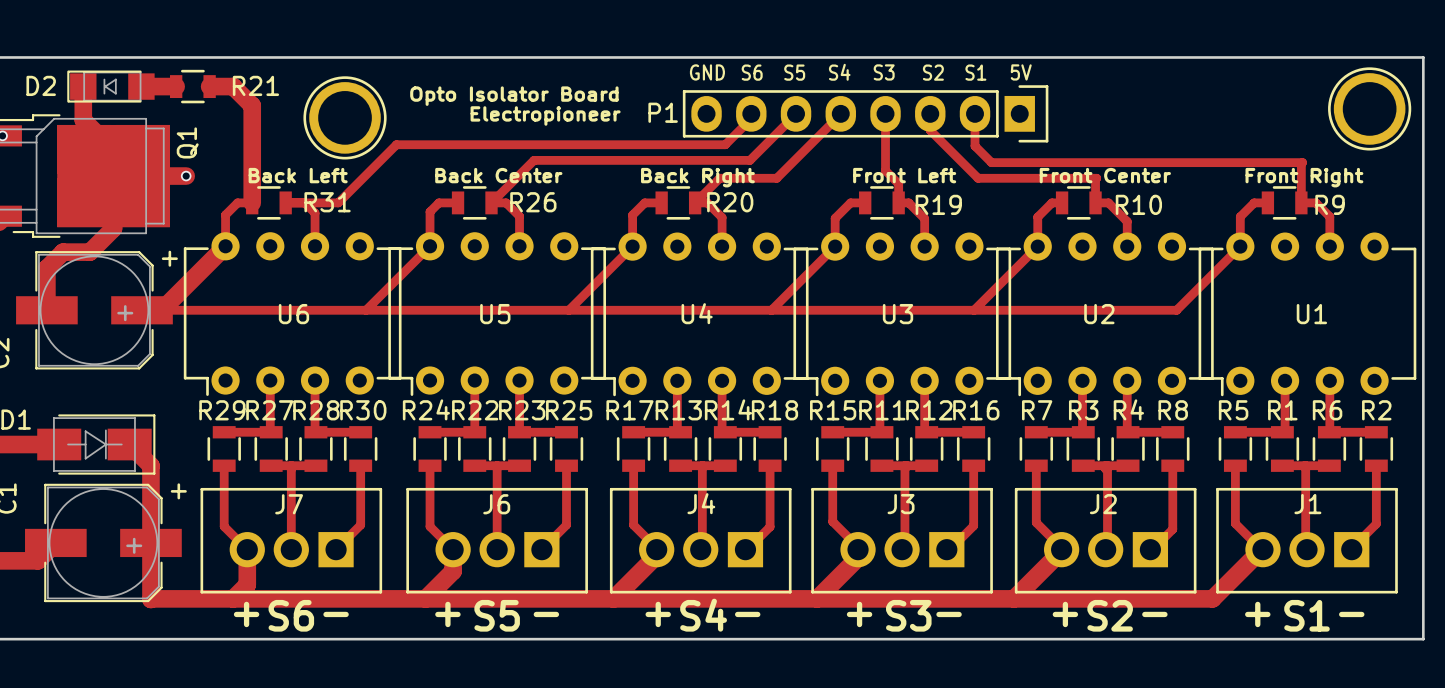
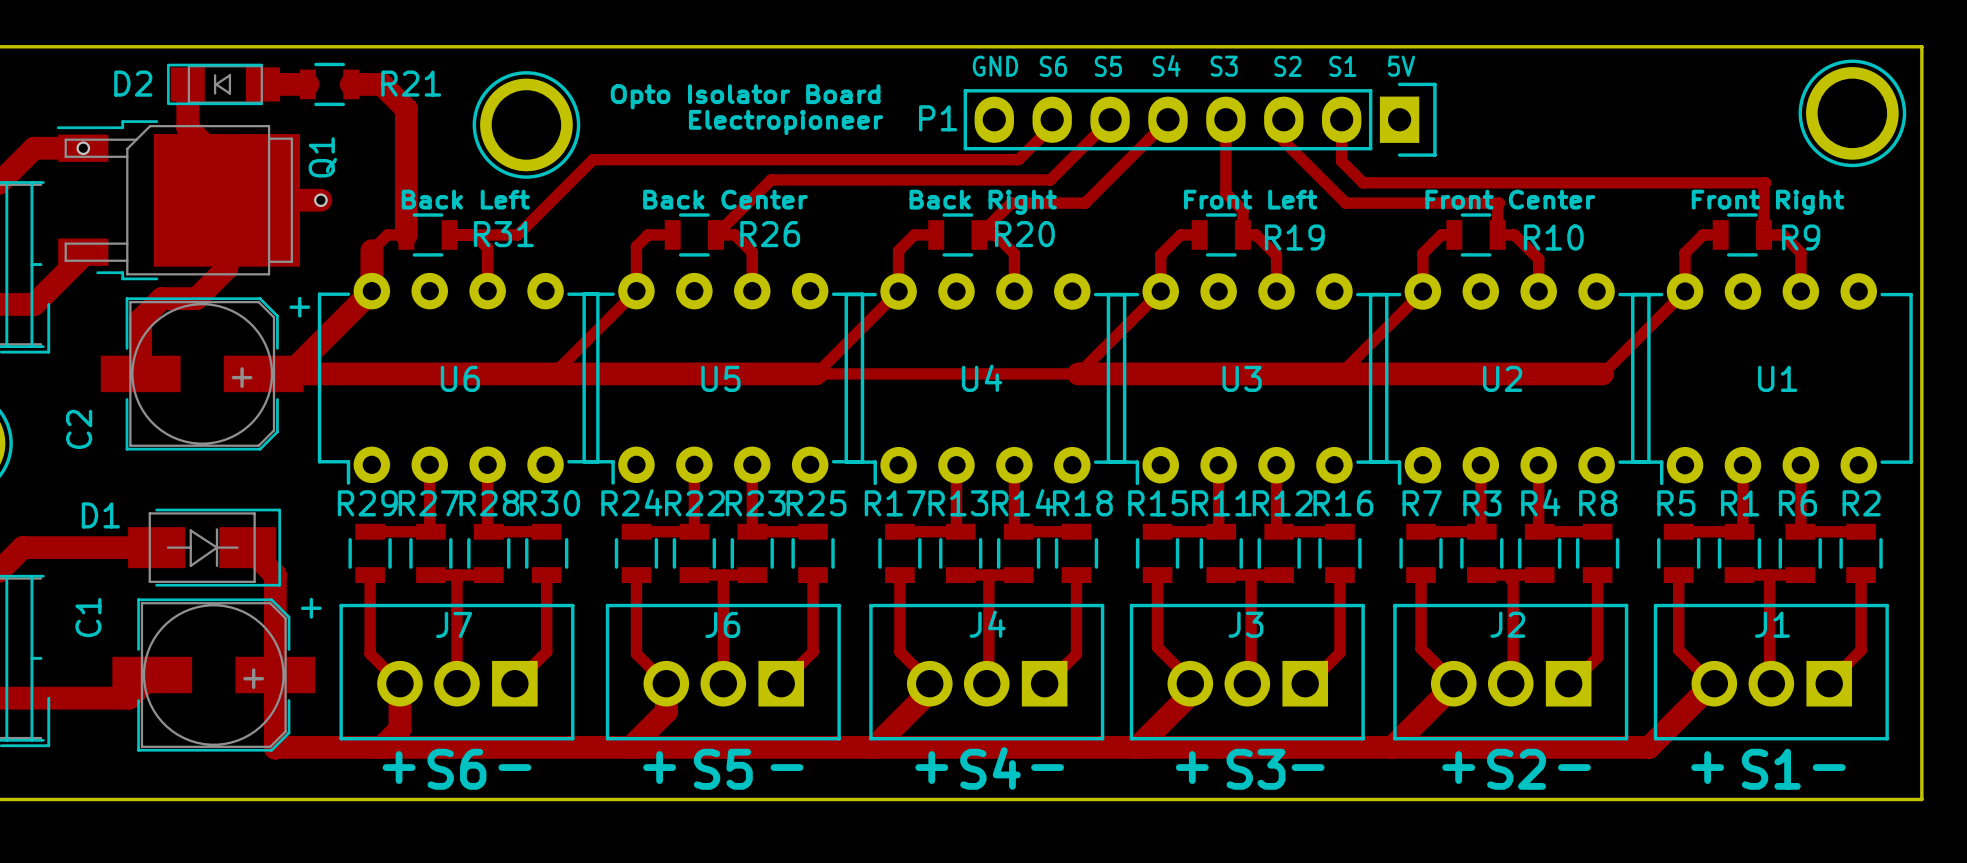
track width: thin (225, 214) (225, 246) -> thick (371, 250) (371, 291)
track width: thin (161, 310) (568, 310) -> thick (289, 373) (816, 373)
track width: thin (771, 310) (1176, 310) -> thick (1078, 373) (1602, 373)

